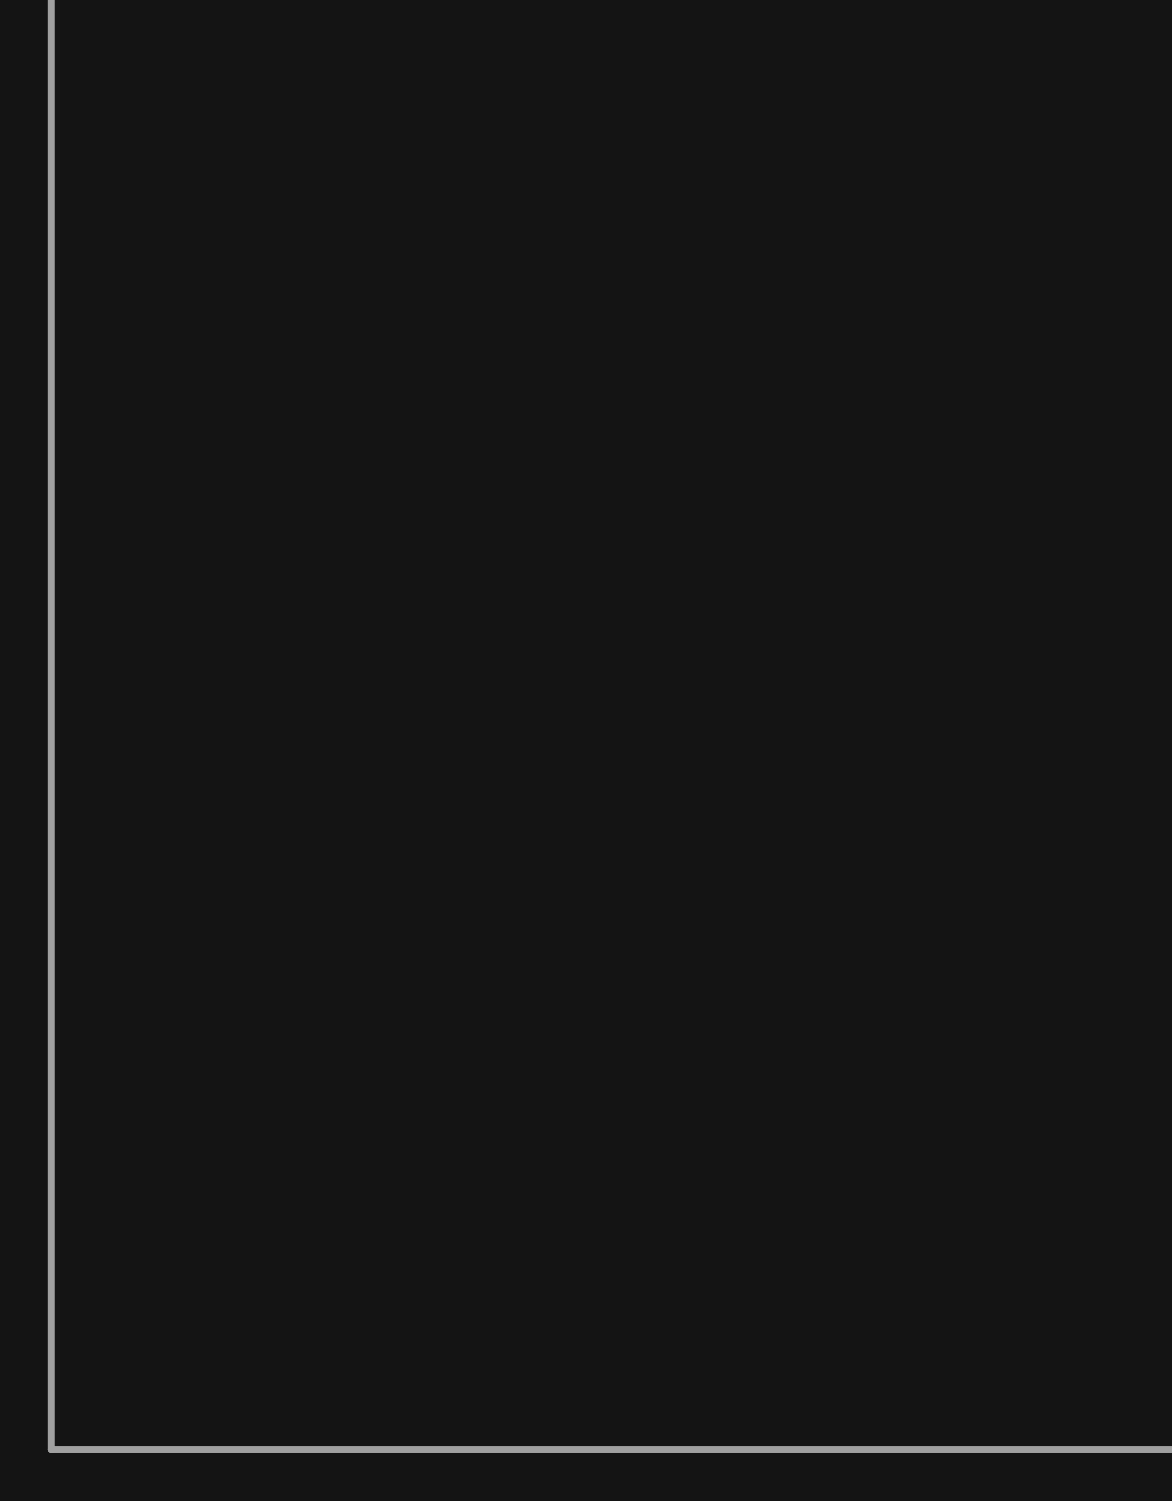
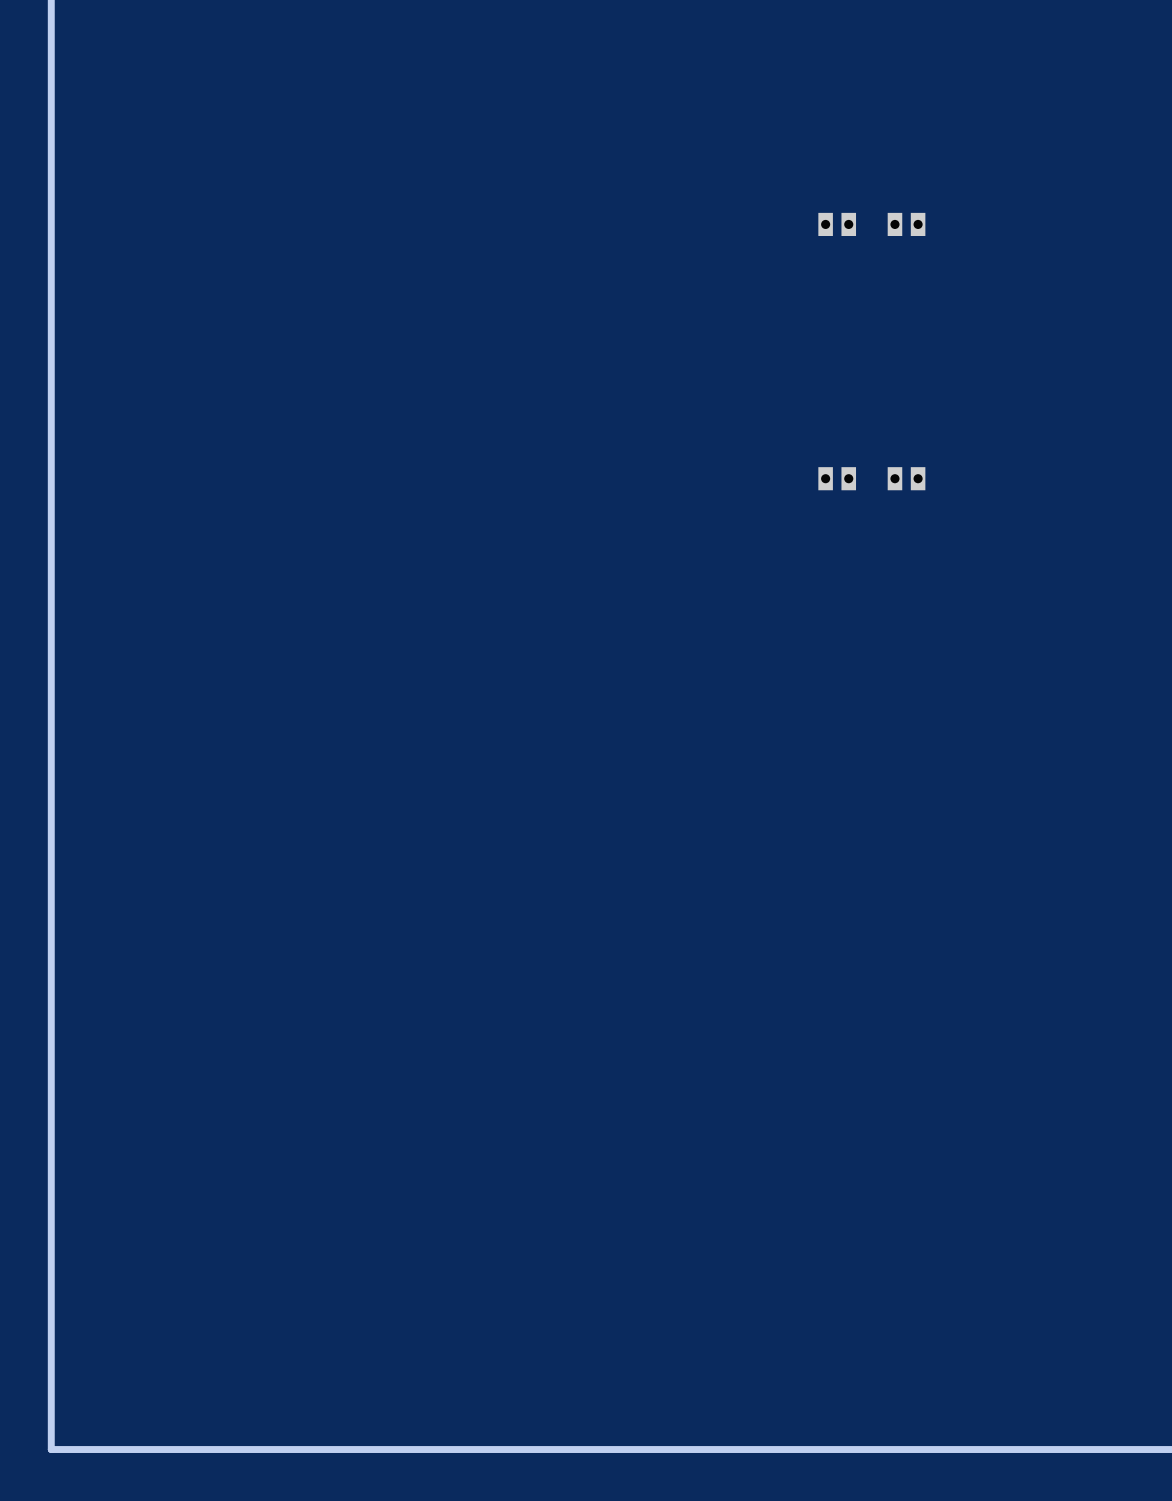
part: none -> (871, 224)
part: none -> (871, 478)

